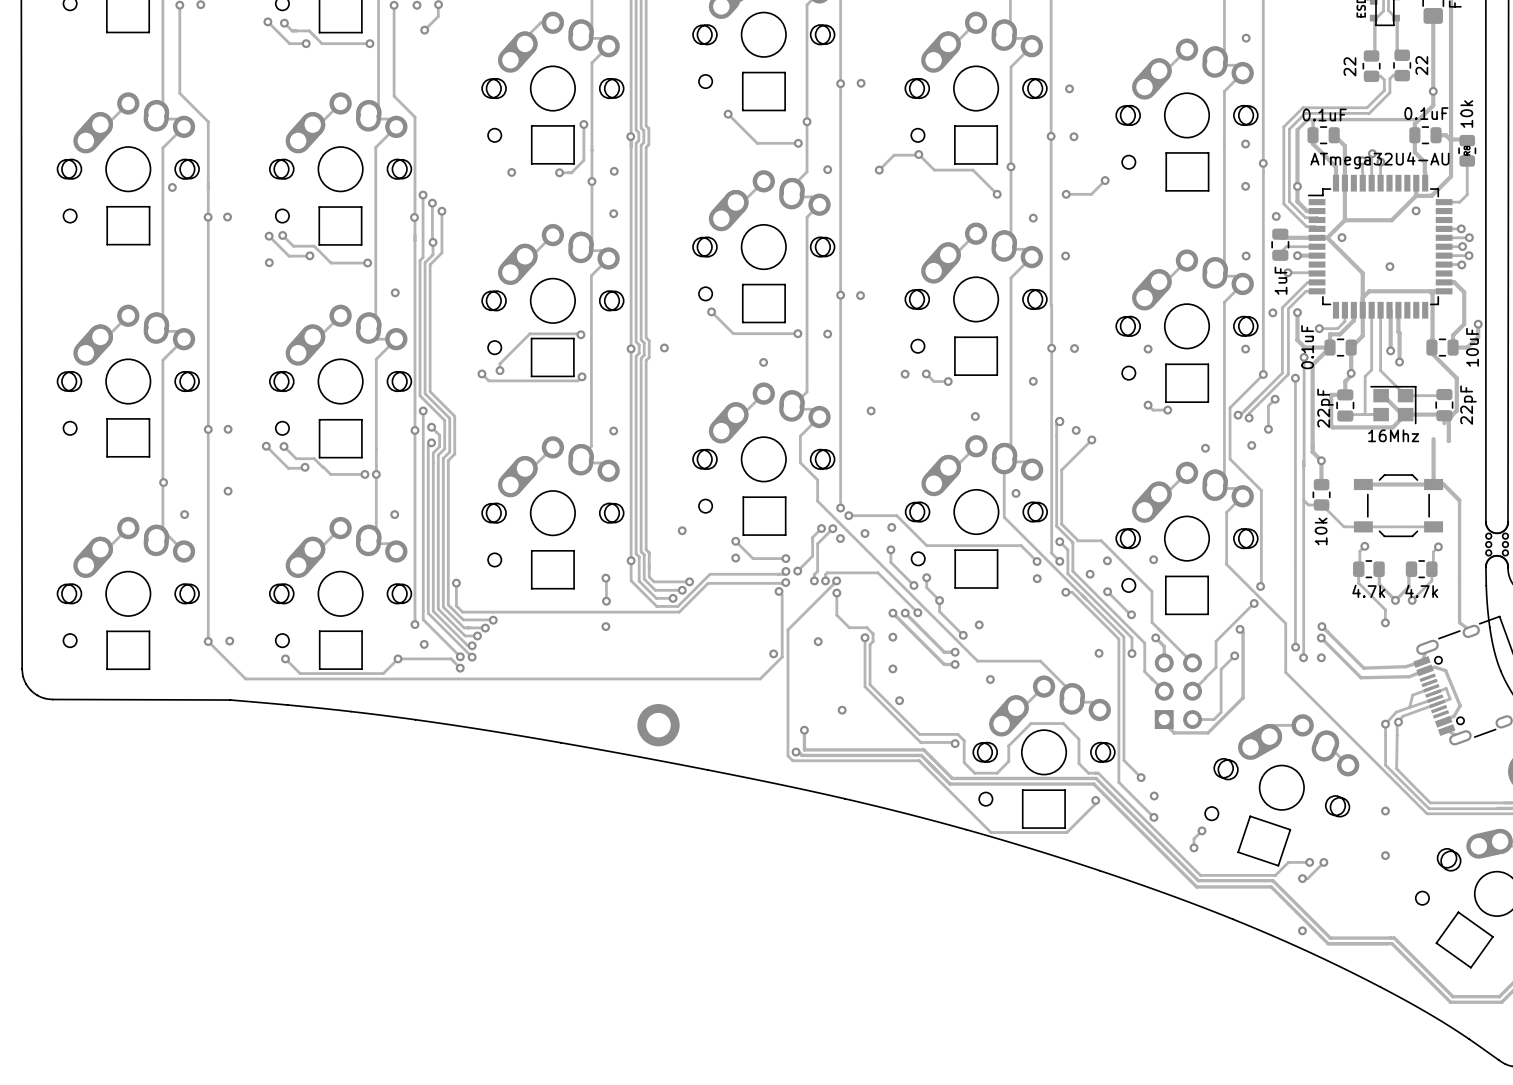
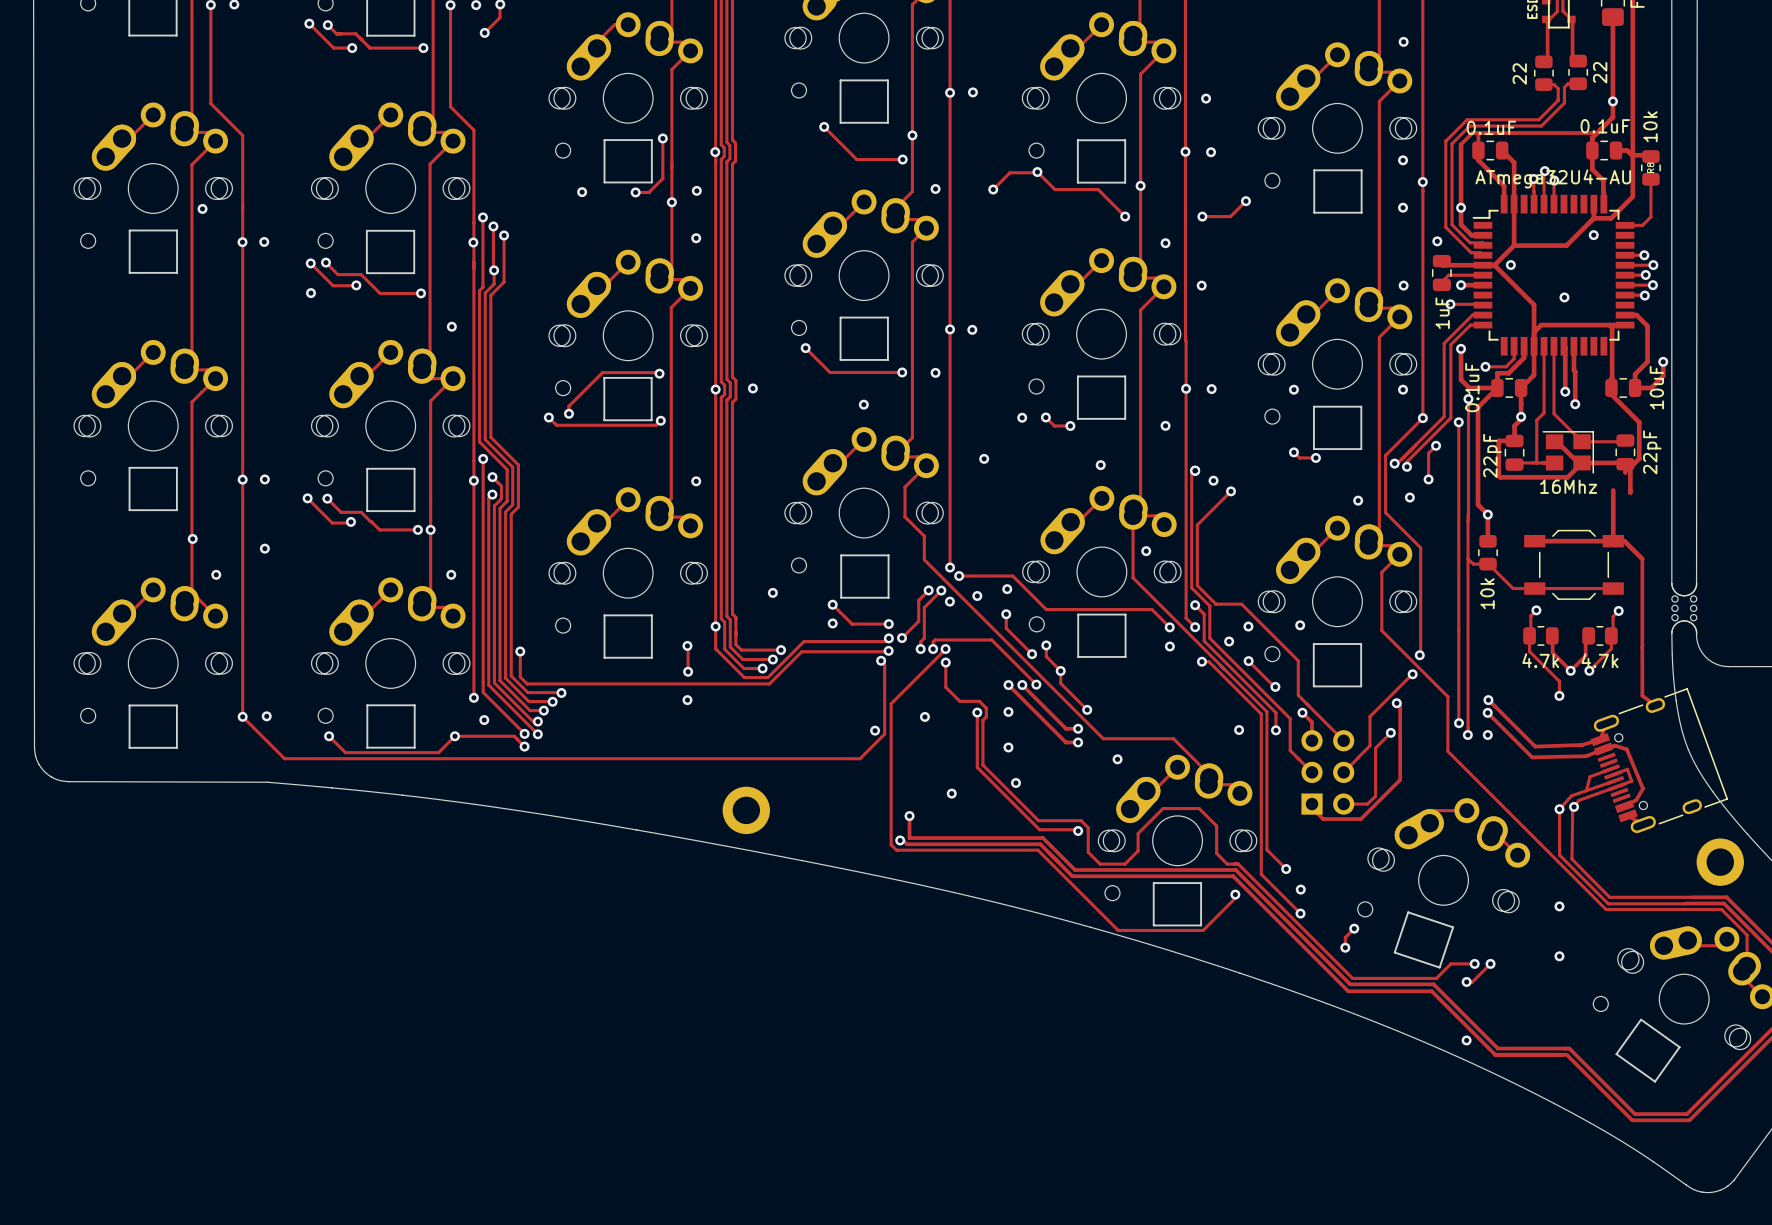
via: (1272, 312) -> none
via: (979, 624) -> none

